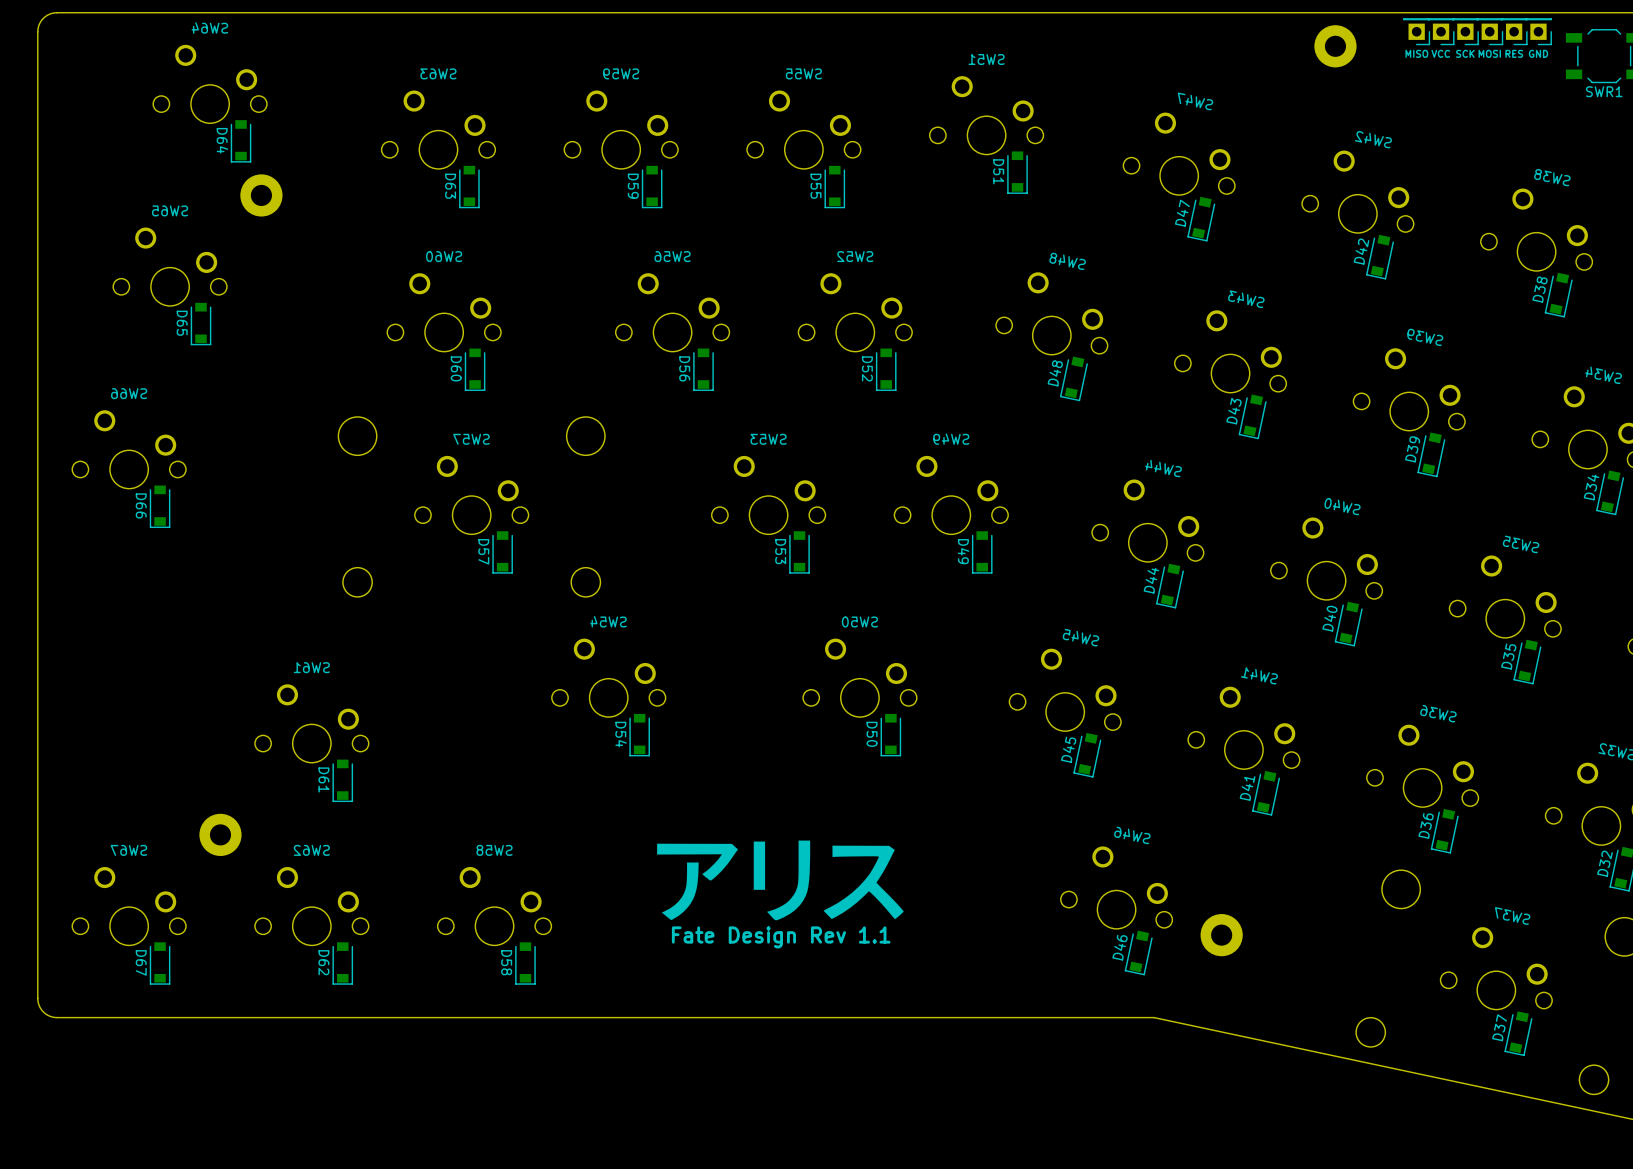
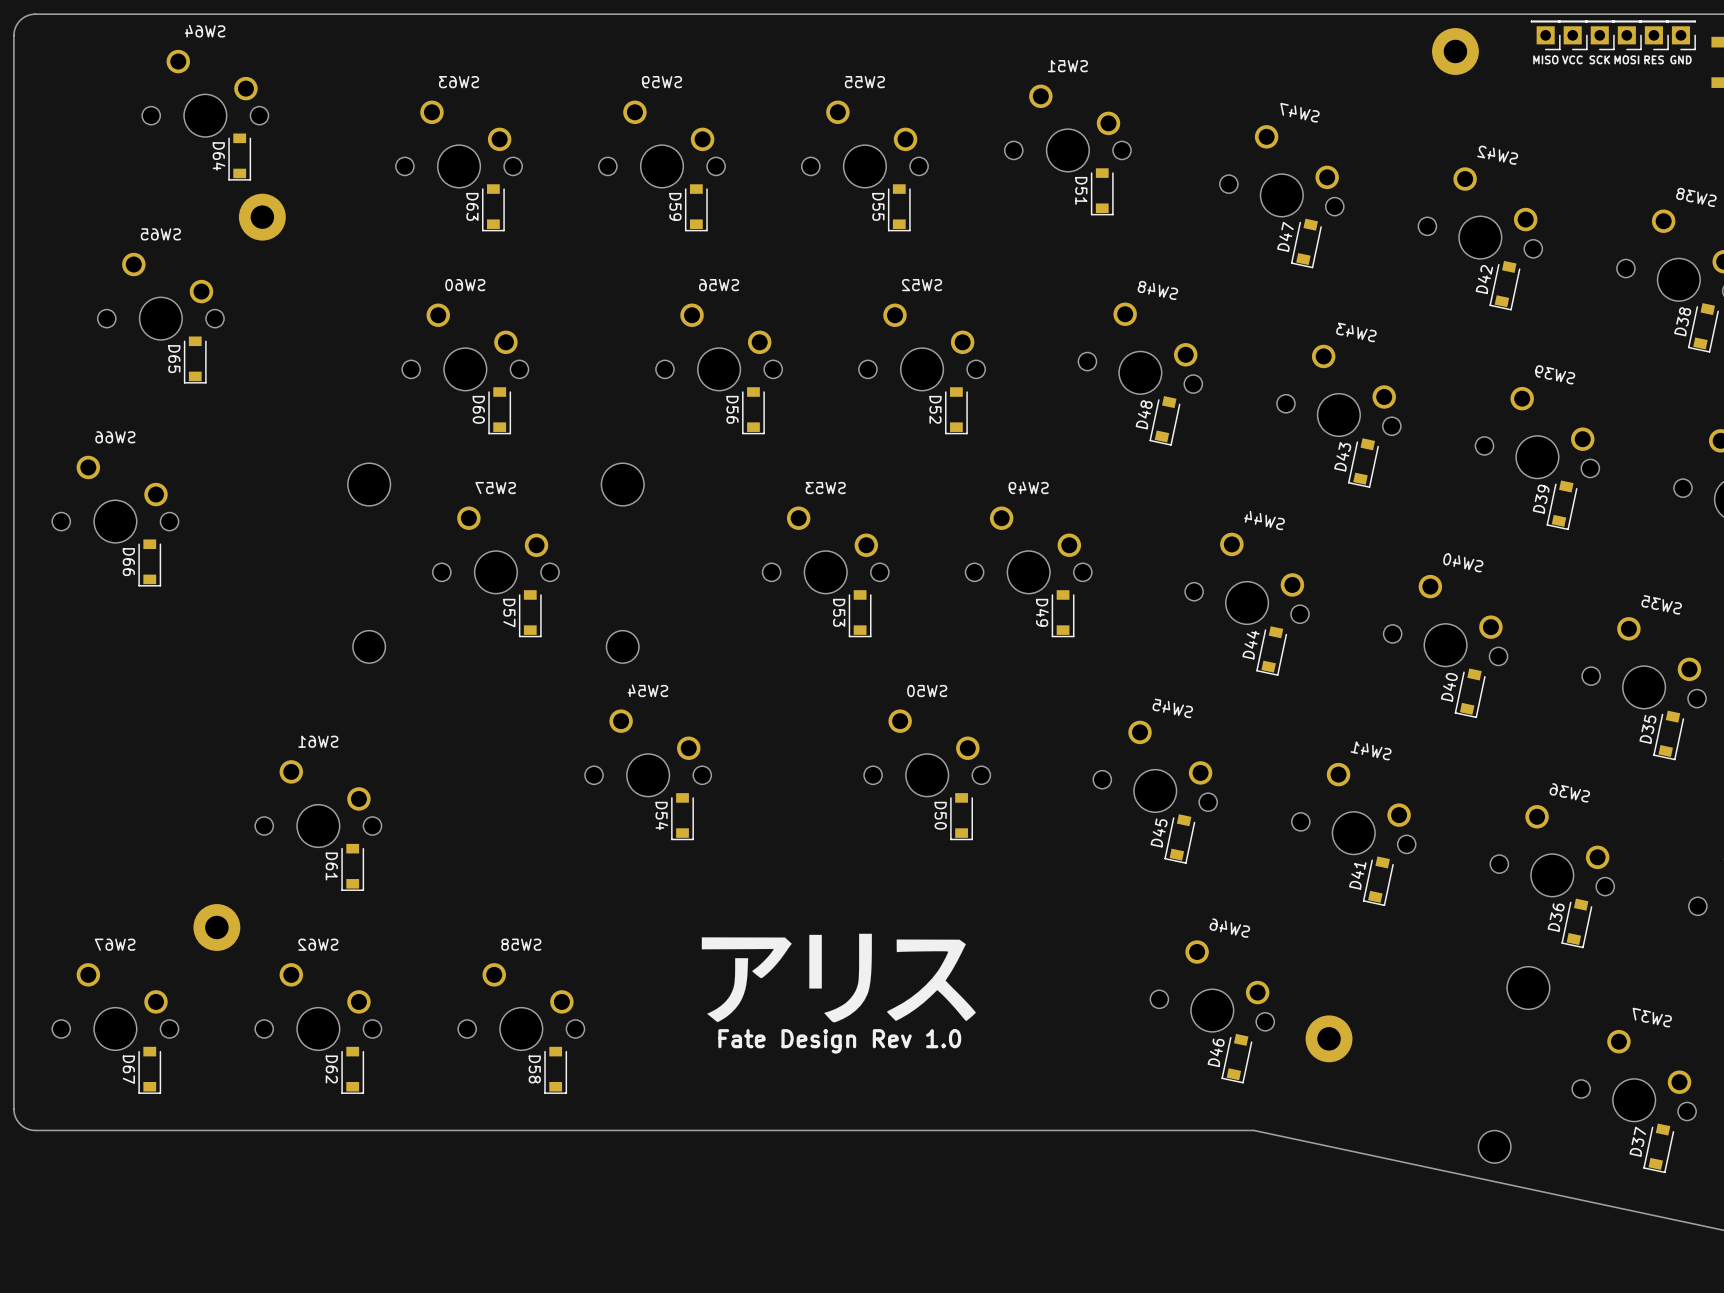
text: Fate Design Rev 1.1 (781, 937) -> Fate Design Rev 1.0 (839, 1041)

